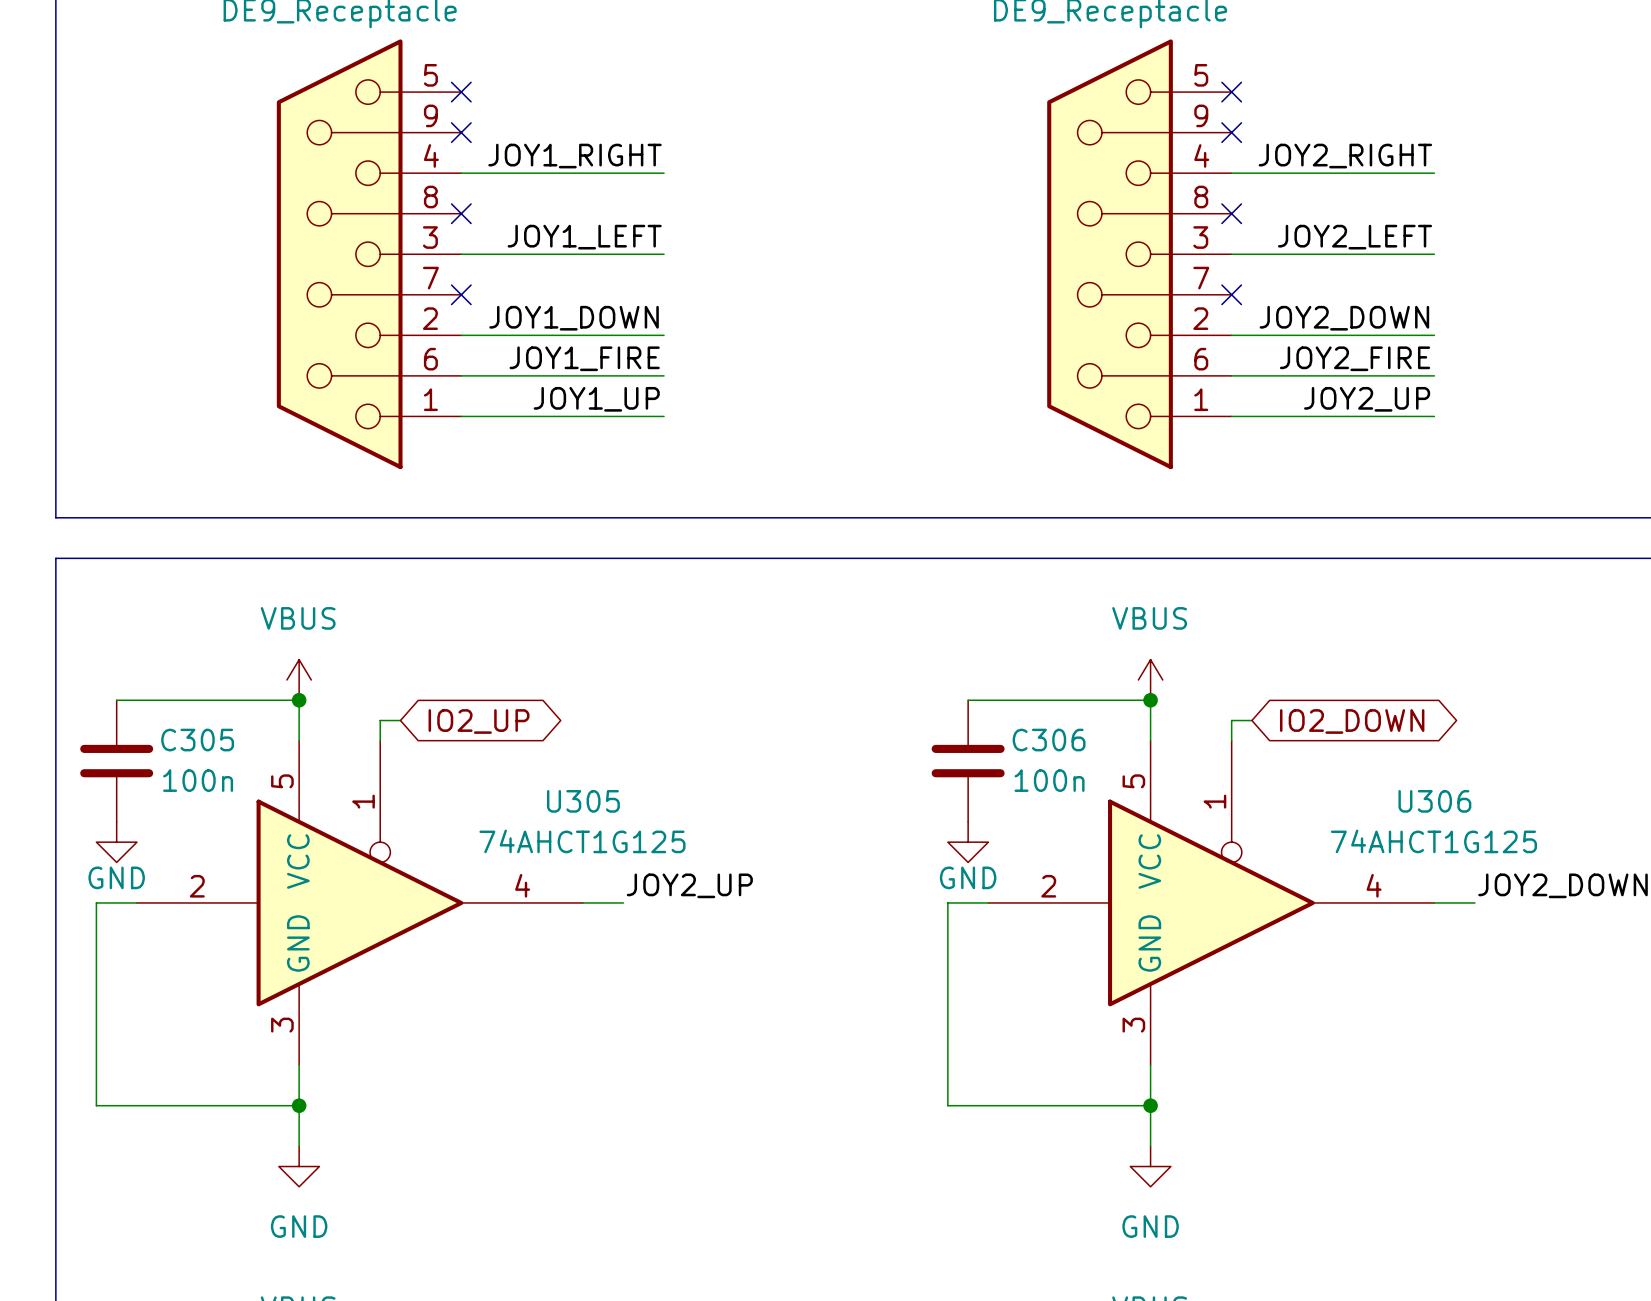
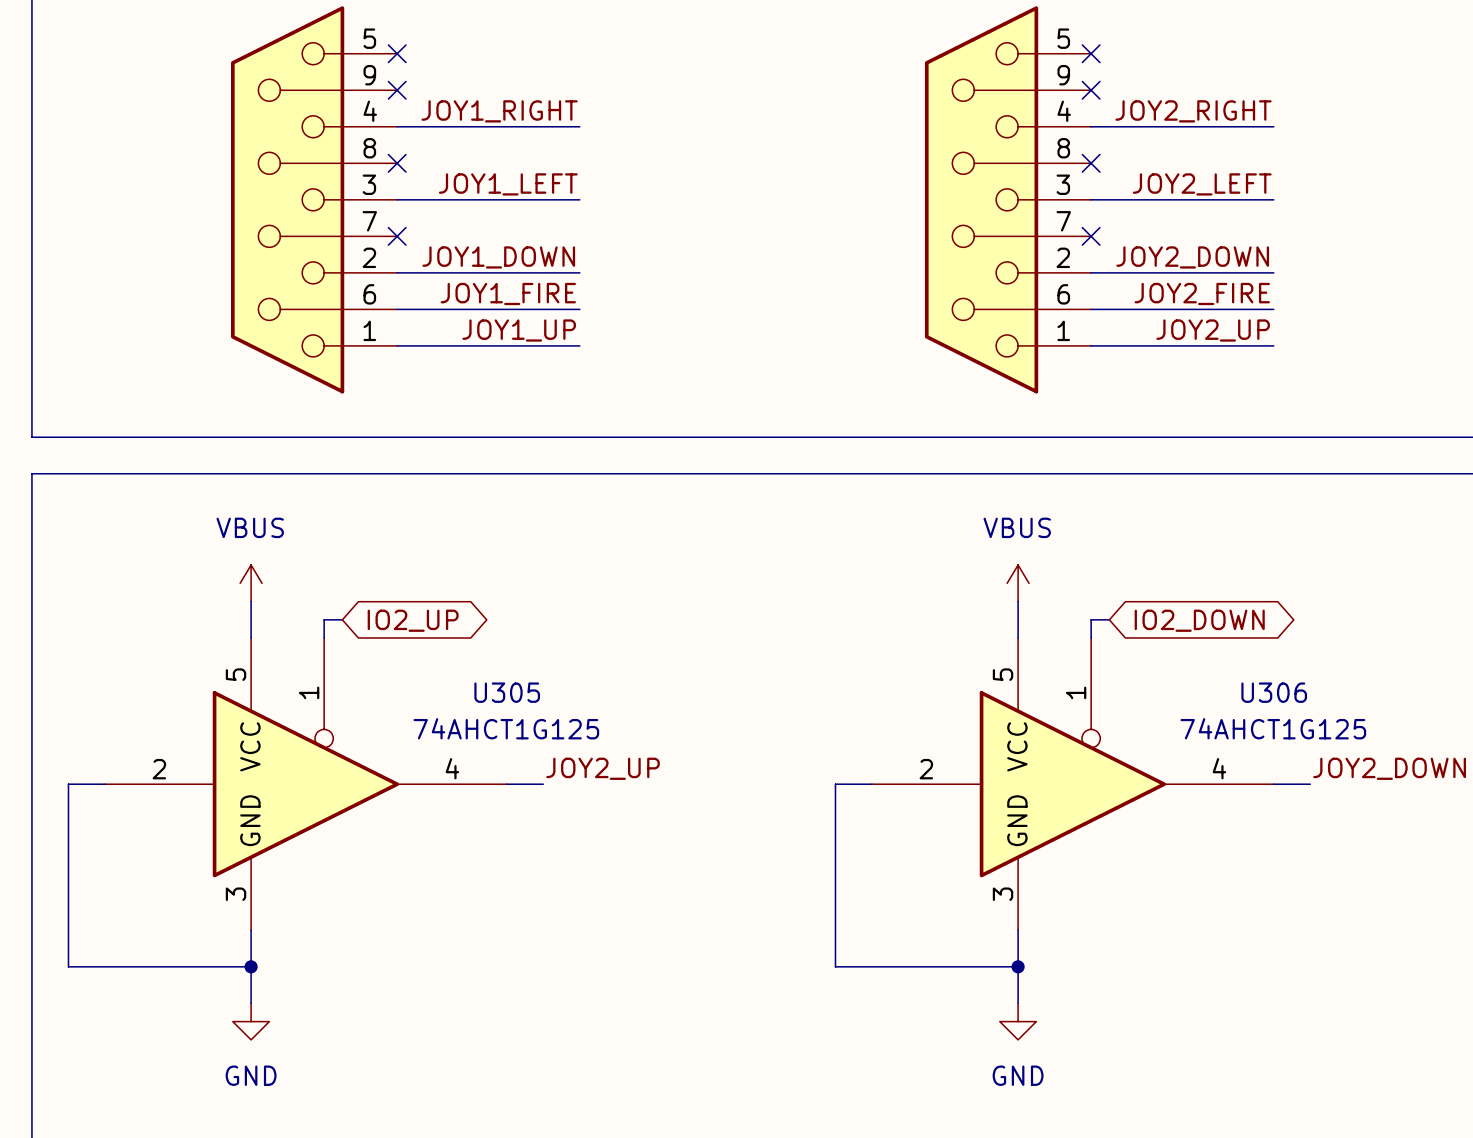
wire: (116, 700) (299, 700) -> none
junction: (299, 700) -> none
wire: (968, 700) (1150, 700) -> none
junction: (1150, 700) -> none
C305: 100n (116, 761) -> none
C306: 100n (968, 761) -> none
power symbol: GND (116, 842) -> none
power symbol: GND (968, 842) -> none

